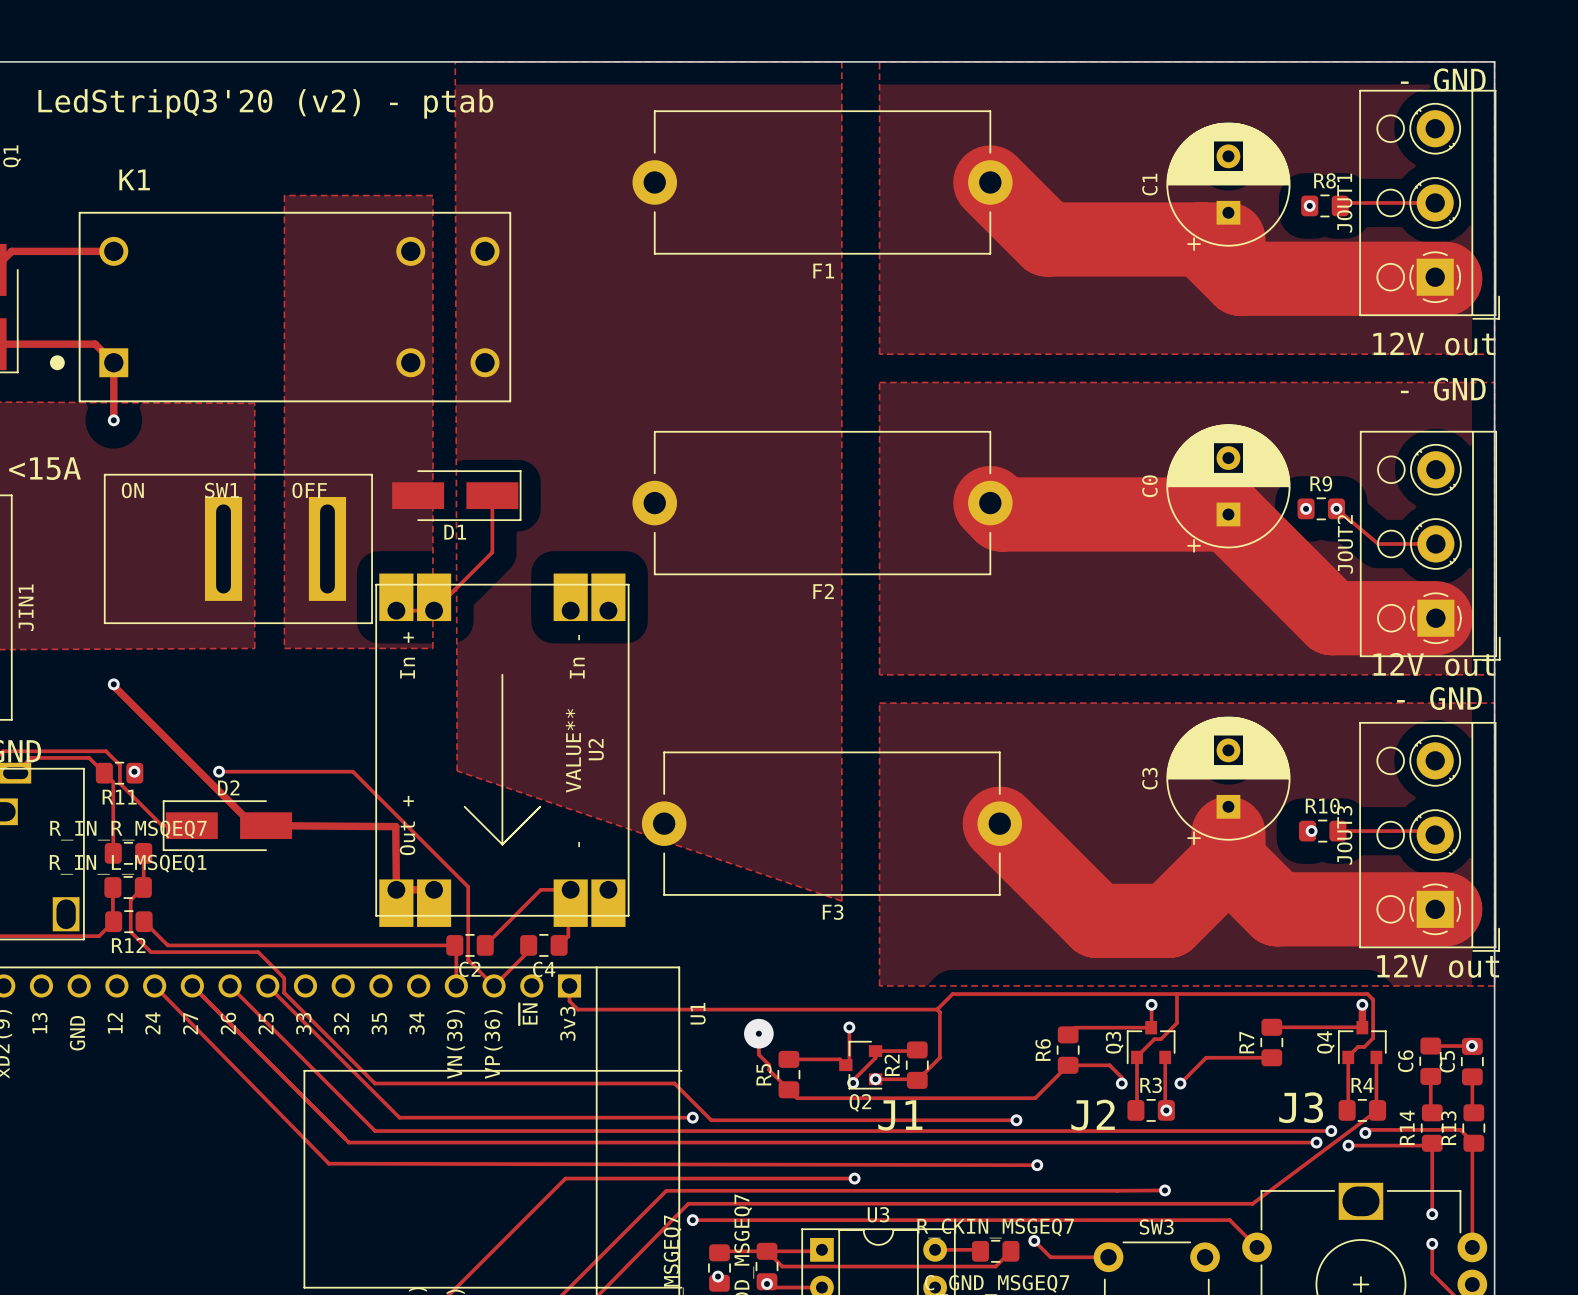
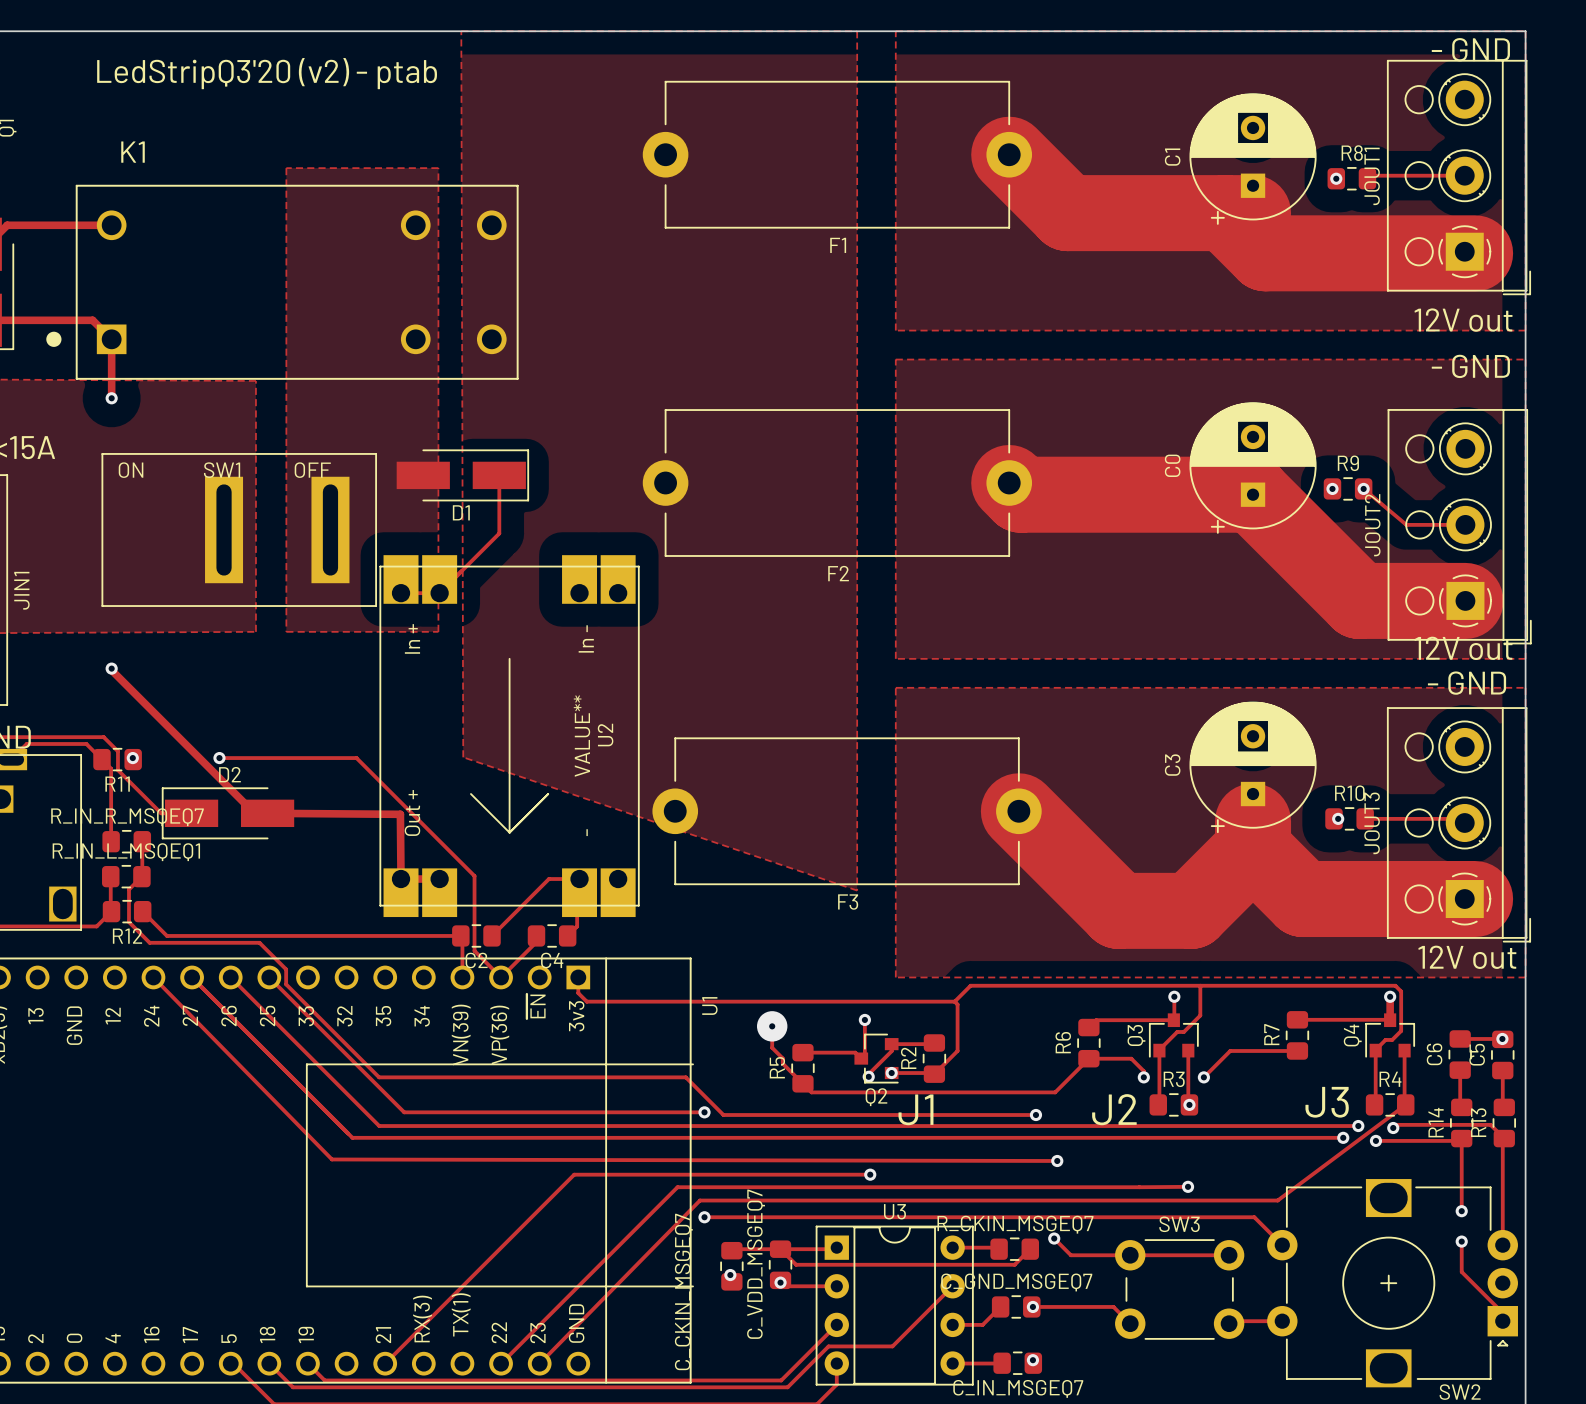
track: none -> (1130, 1255) (1229, 1255)

